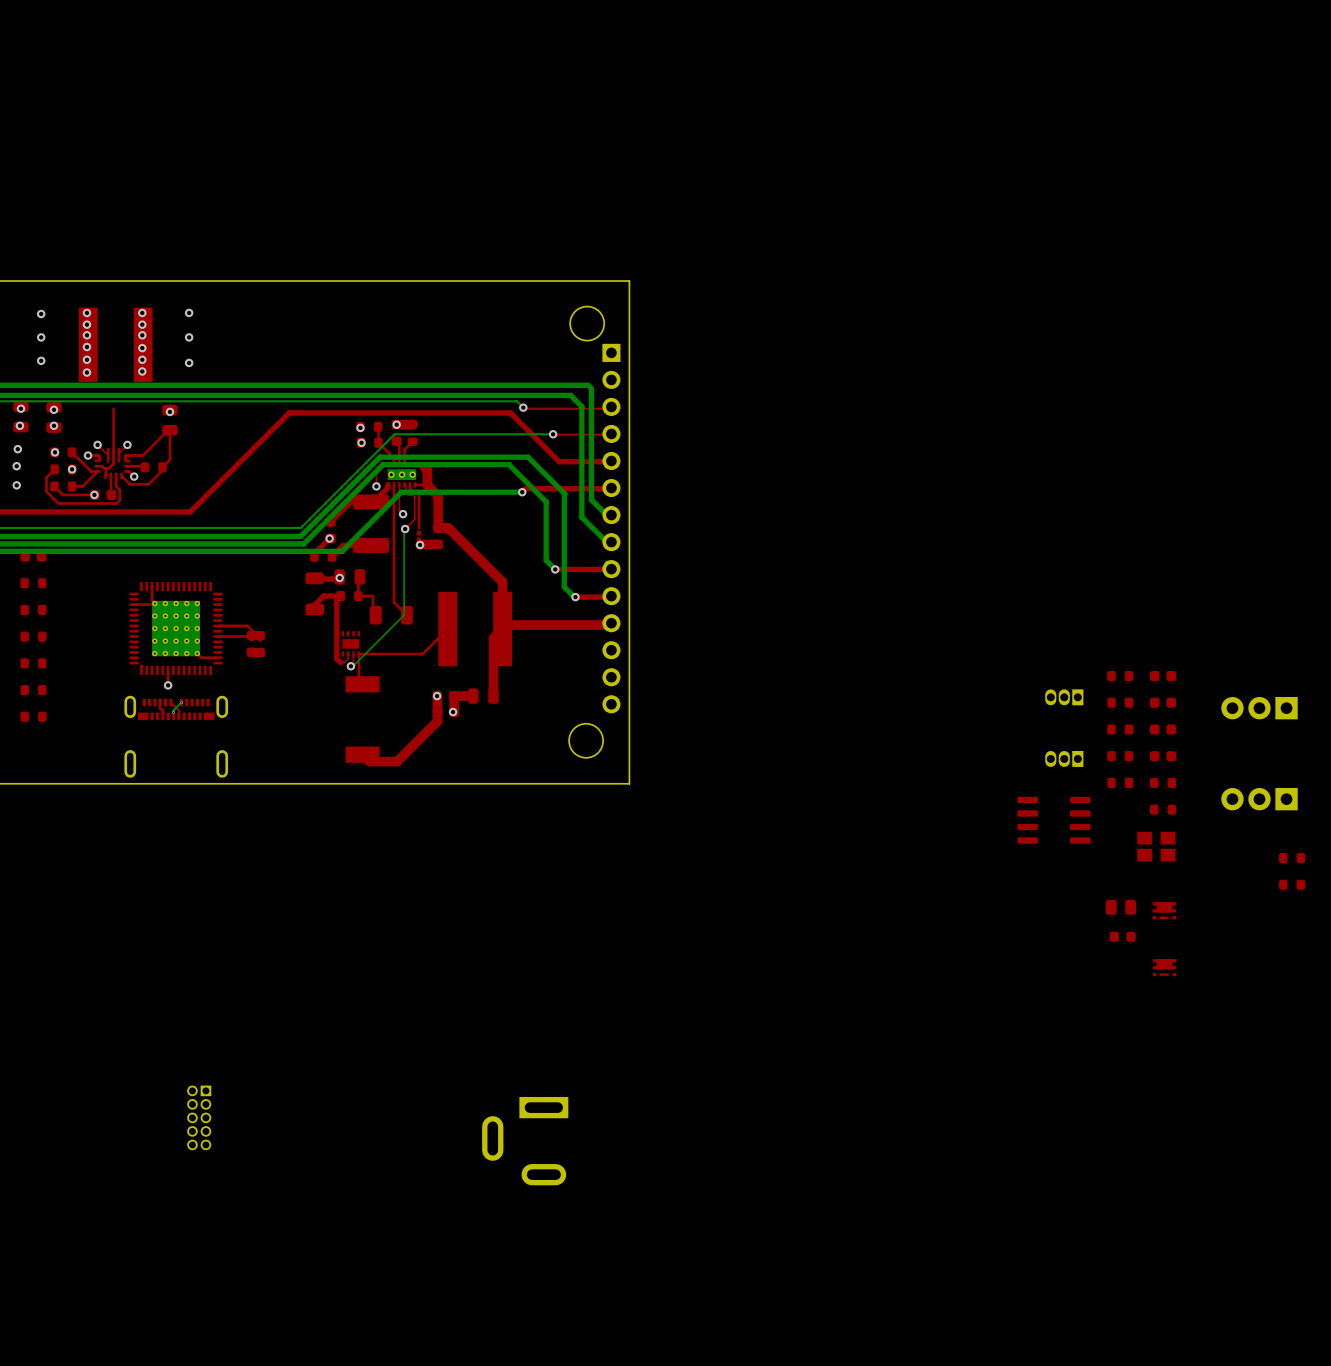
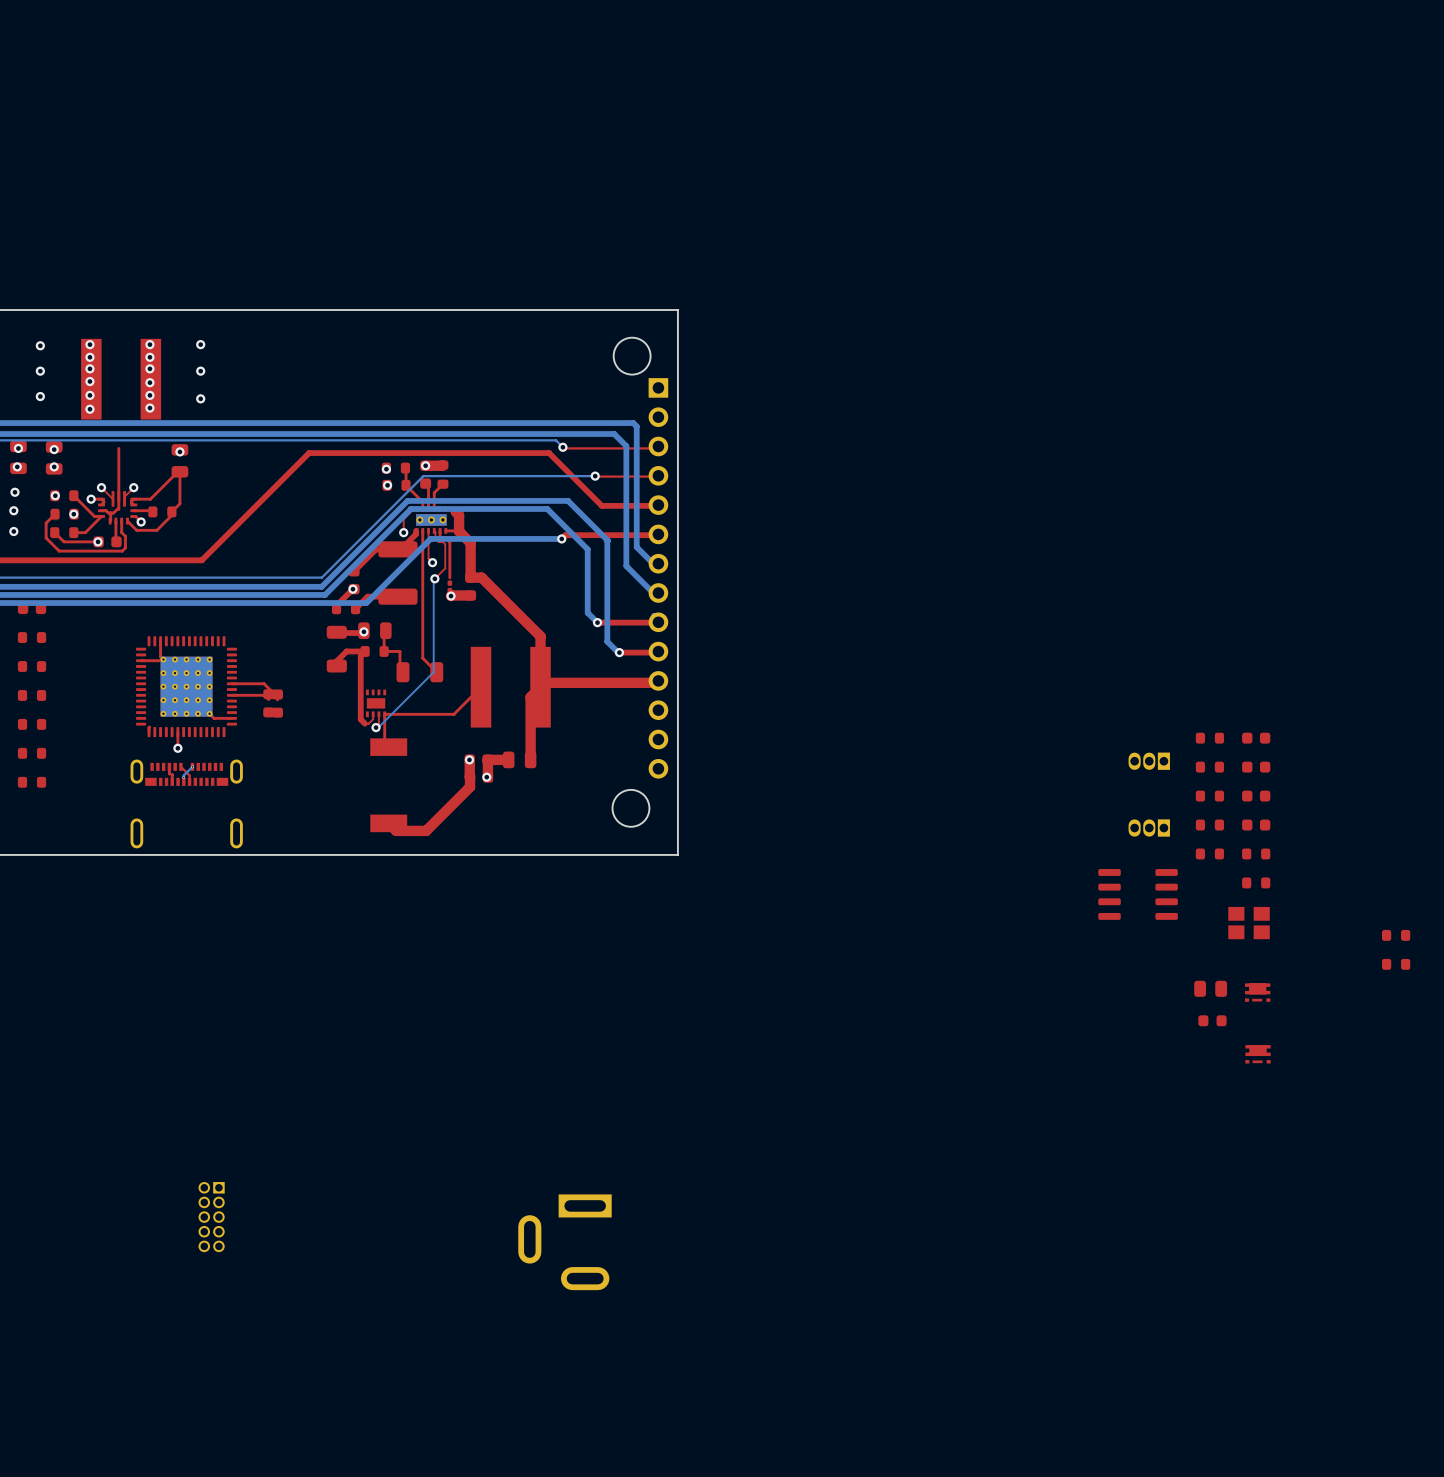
part: (1259, 708) -> none
part: (1259, 799) -> none

